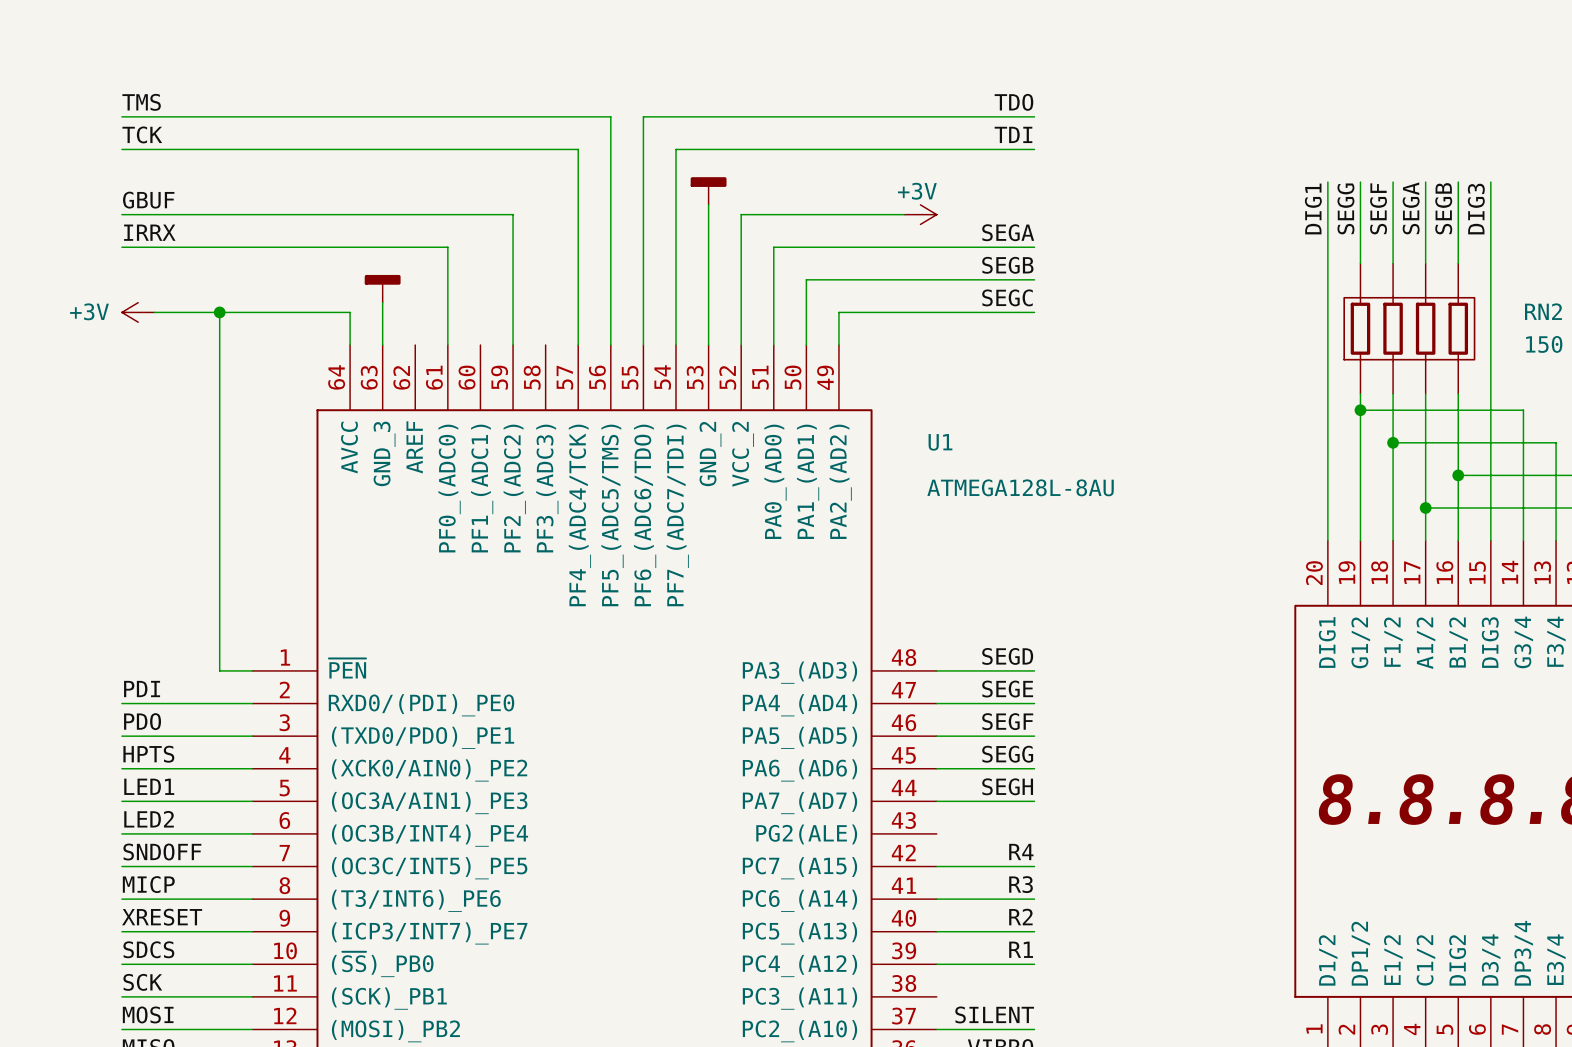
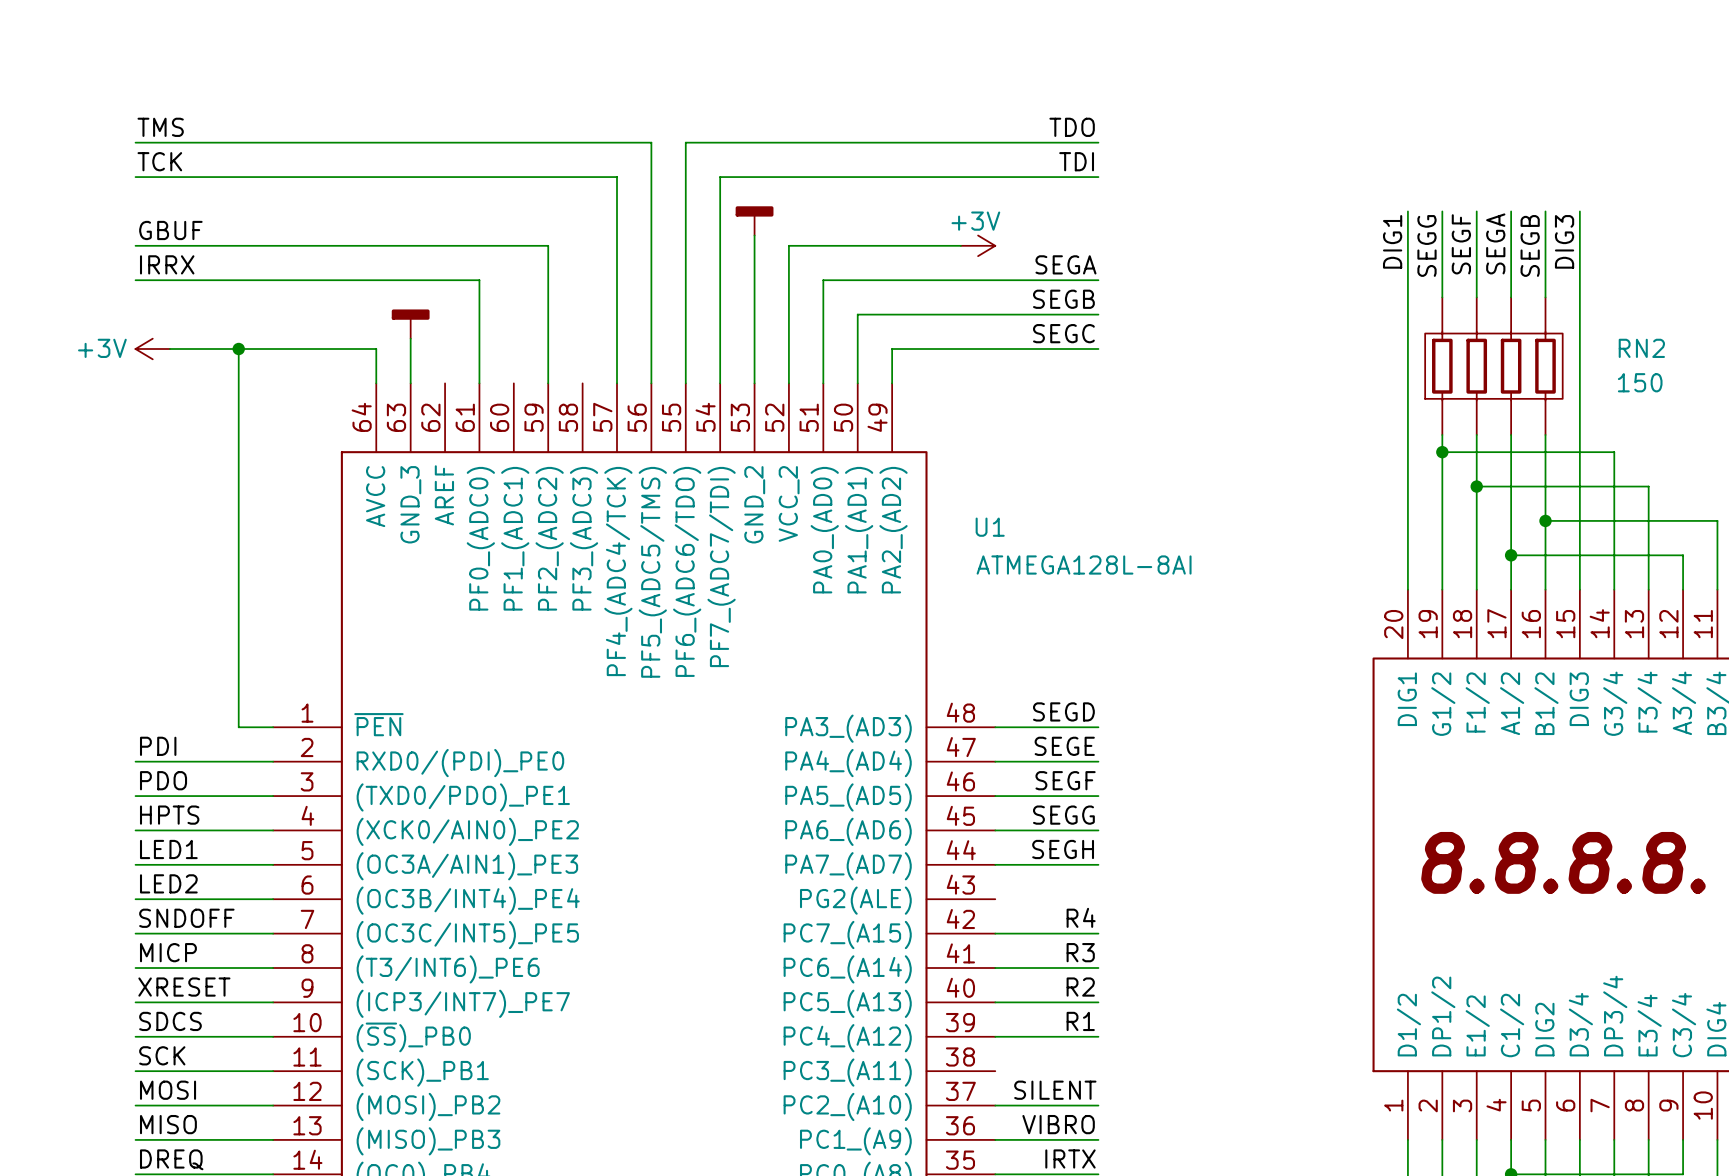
U1 name position: U1 (940, 442) -> U1 (990, 527)
U1 value: ATMEGA128L-8AU (1020, 487) -> ATMEGA128L-8AI (1084, 565)

